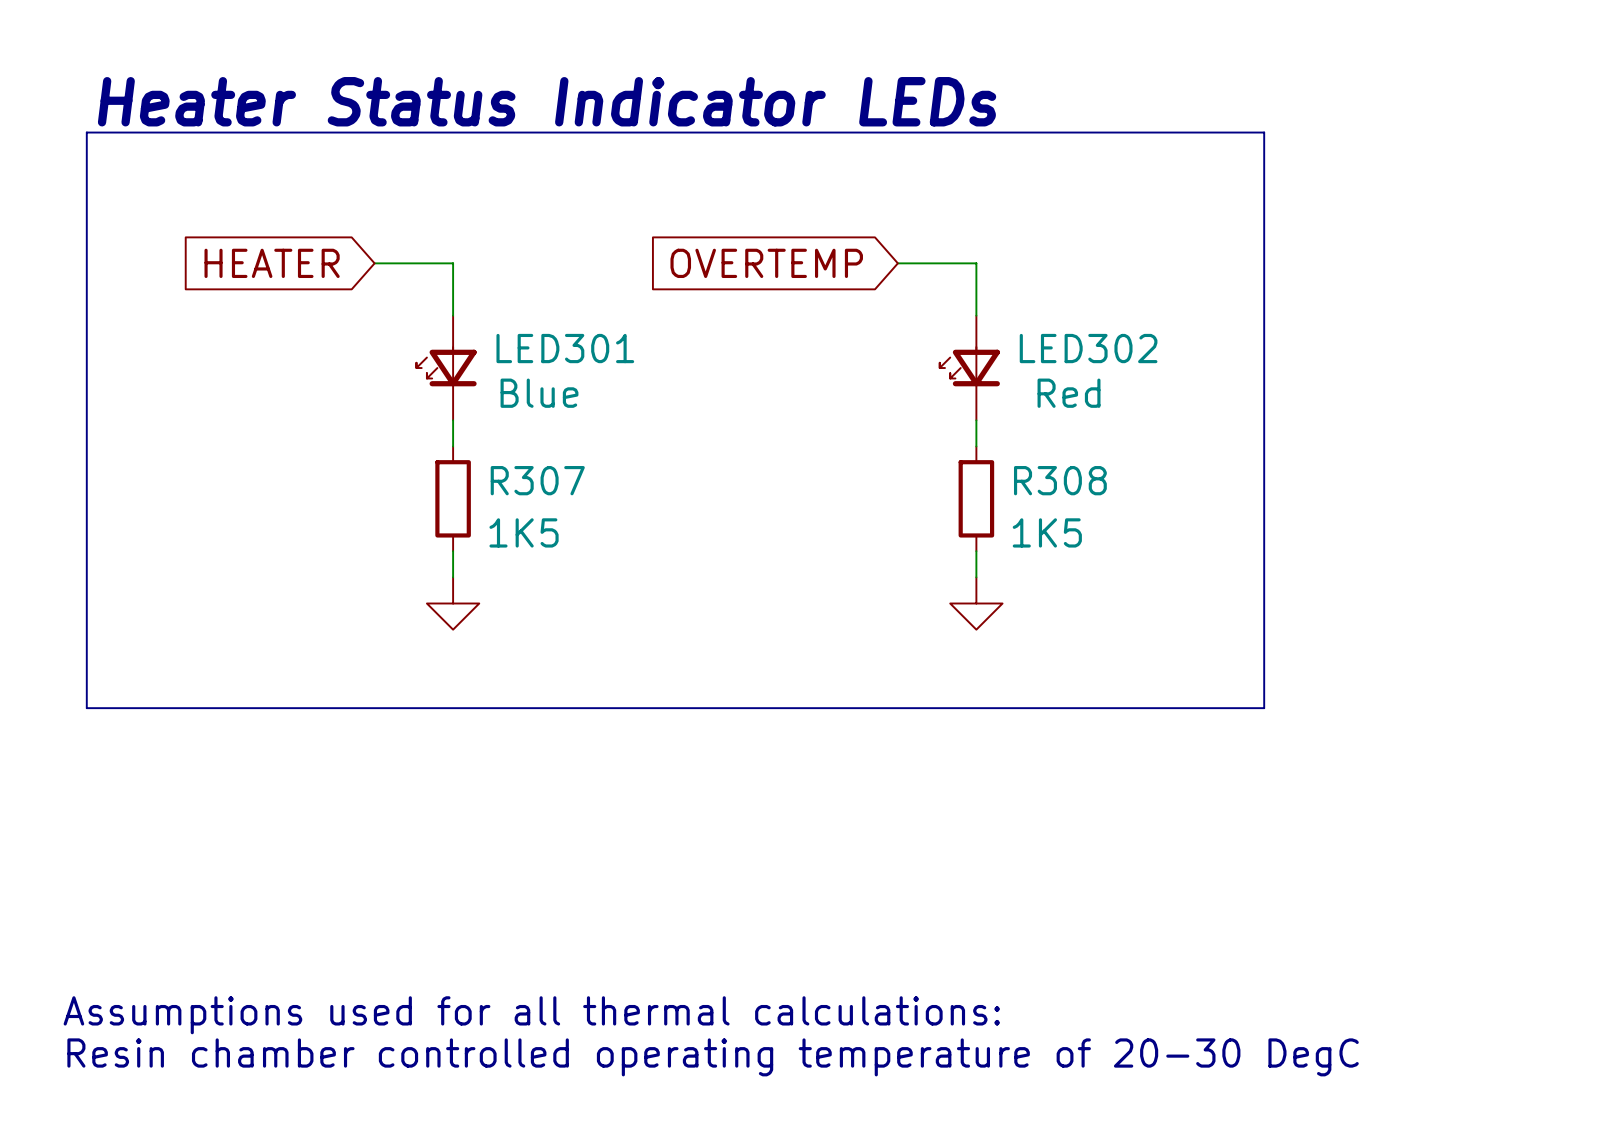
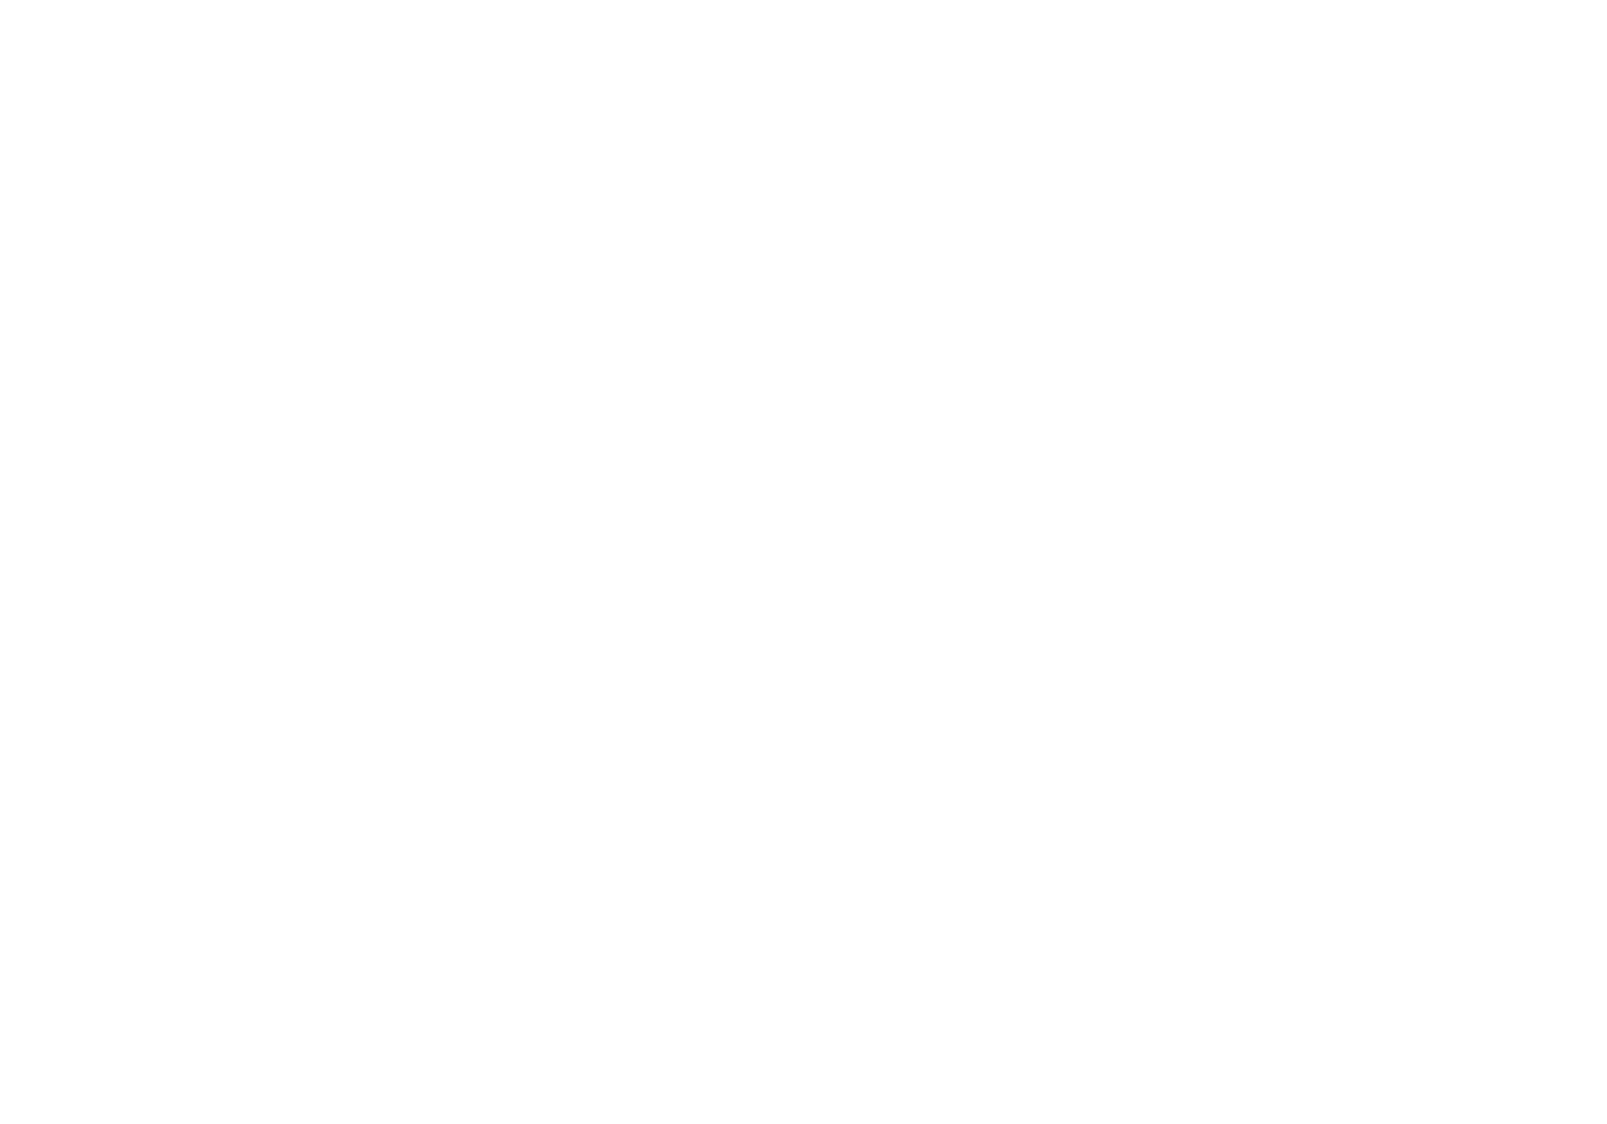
text: Heater Status Indicator LEDs (547, 101) -> none
line: (86, 132) (1264, 132) (1264, 708) (86, 708) (86, 132) -> none
global label: HEATER (272, 263) -> none
wire: (374, 263) (453, 263) (453, 315) -> none
global label: OVERTEMP (766, 263) -> none
wire: (897, 263) (976, 263) (976, 315) -> none
LED301: Blue (446, 368) -> none
LED302: Red (969, 368) -> none
wire: (453, 420) (453, 446) -> none
wire: (976, 420) (976, 446) -> none
R307: 1K5 (453, 498) -> none
R308: 1K5 (976, 498) -> none
wire: (453, 551) (453, 577) -> none
wire: (976, 551) (976, 577) -> none
power symbol: (453, 603) -> none
power symbol: (976, 603) -> none
text: Assumptions used for all thermal calculations: (531, 1015) -> none
text: Resin chamber controlled operating temperature of 20-30 DegC (713, 1057) -> none

